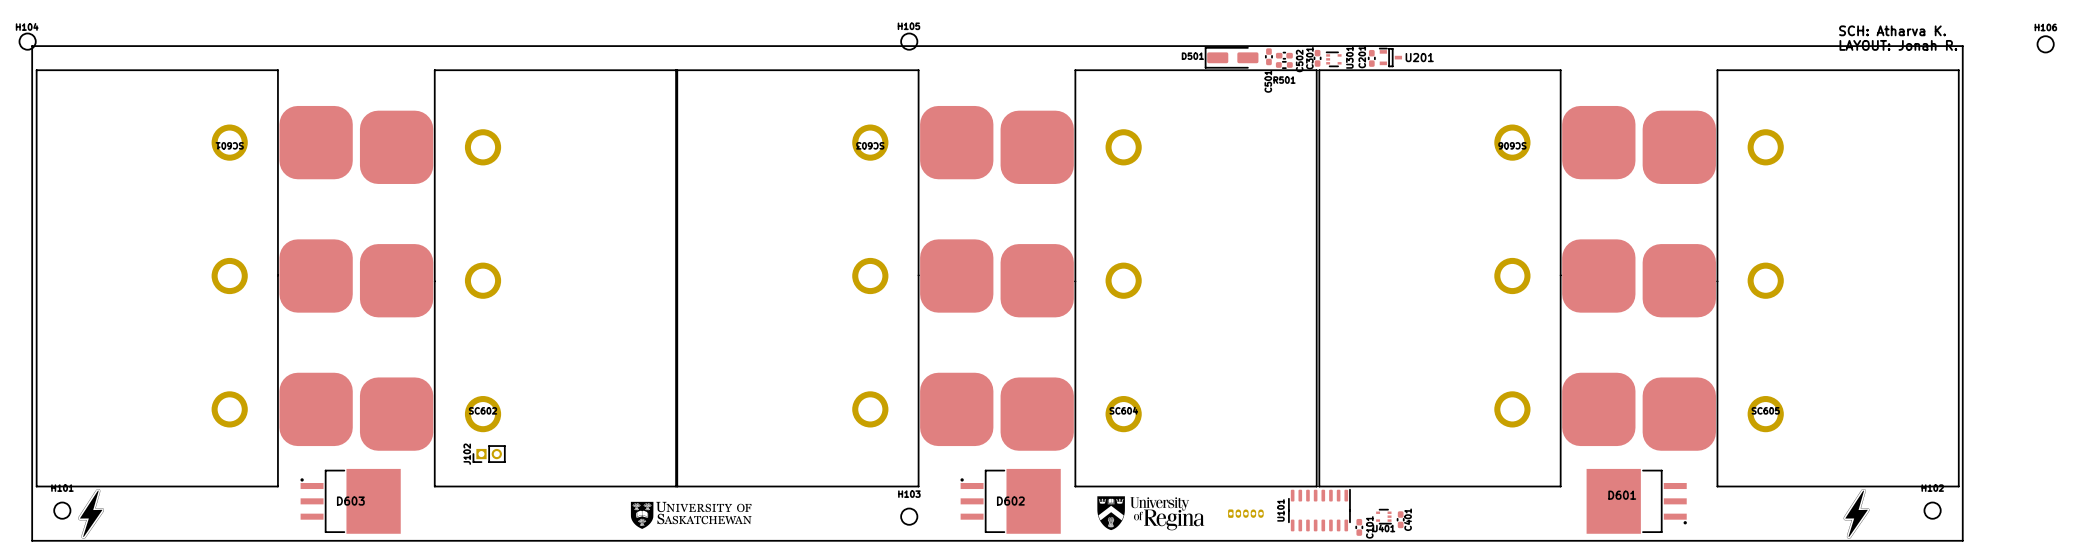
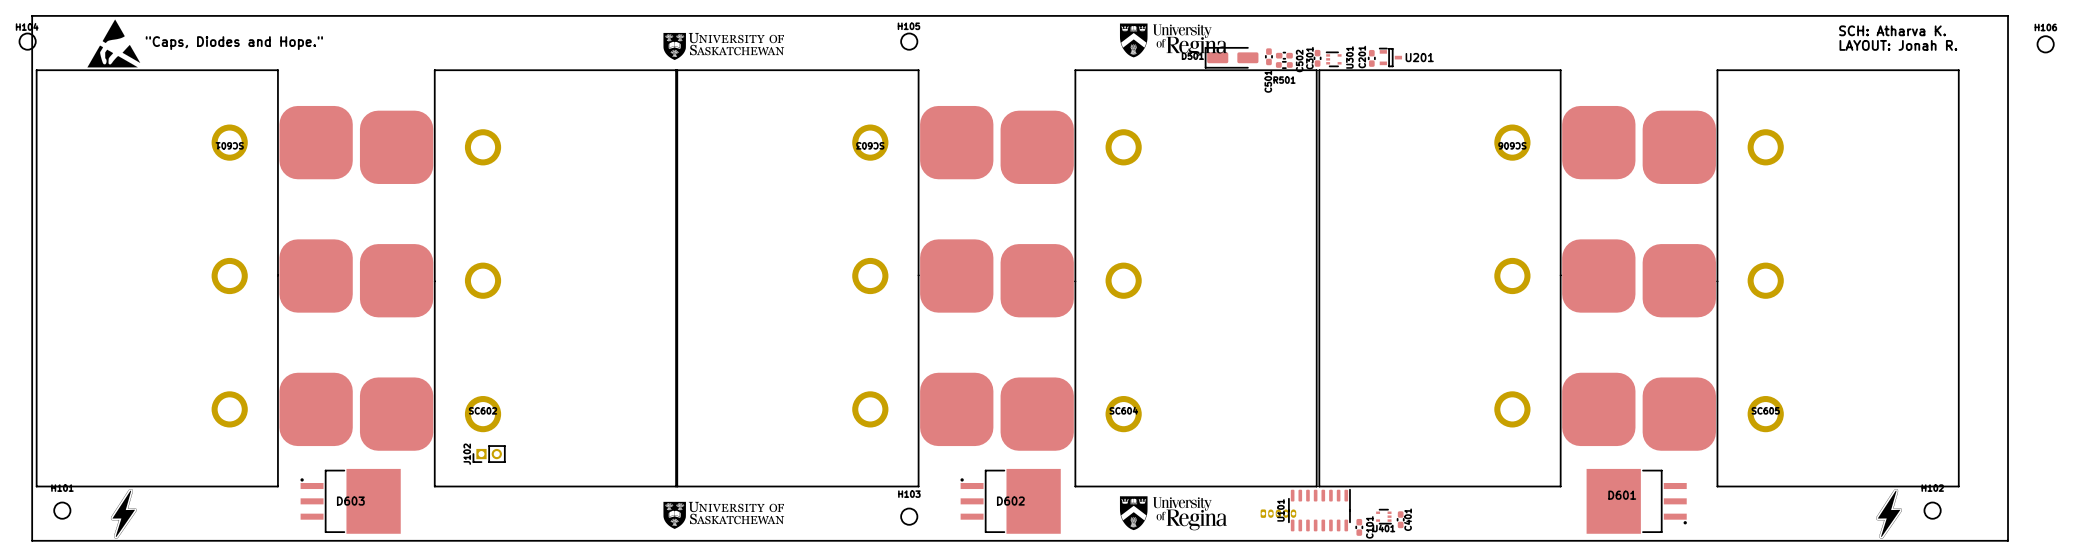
drawing: none -> [87, 19, 141, 68]
drawing: none -> [1119, 23, 1227, 58]
drawing: none -> [663, 32, 785, 61]
text: none -> "Caps, Diodes and Hope." (234, 43)
board edge: (32, 46) (1962, 46) (1962, 540) -> (32, 46) (32, 15) (2008, 15) (2008, 540) (1962, 540)
drawing position: (91, 513) -> (123, 513)
drawing position: (1150, 513) -> (1173, 513)
part position: (1245, 513) -> (1278, 513)
drawing position: (1856, 513) -> (1889, 513)
drawing position: (691, 515) -> (723, 515)

